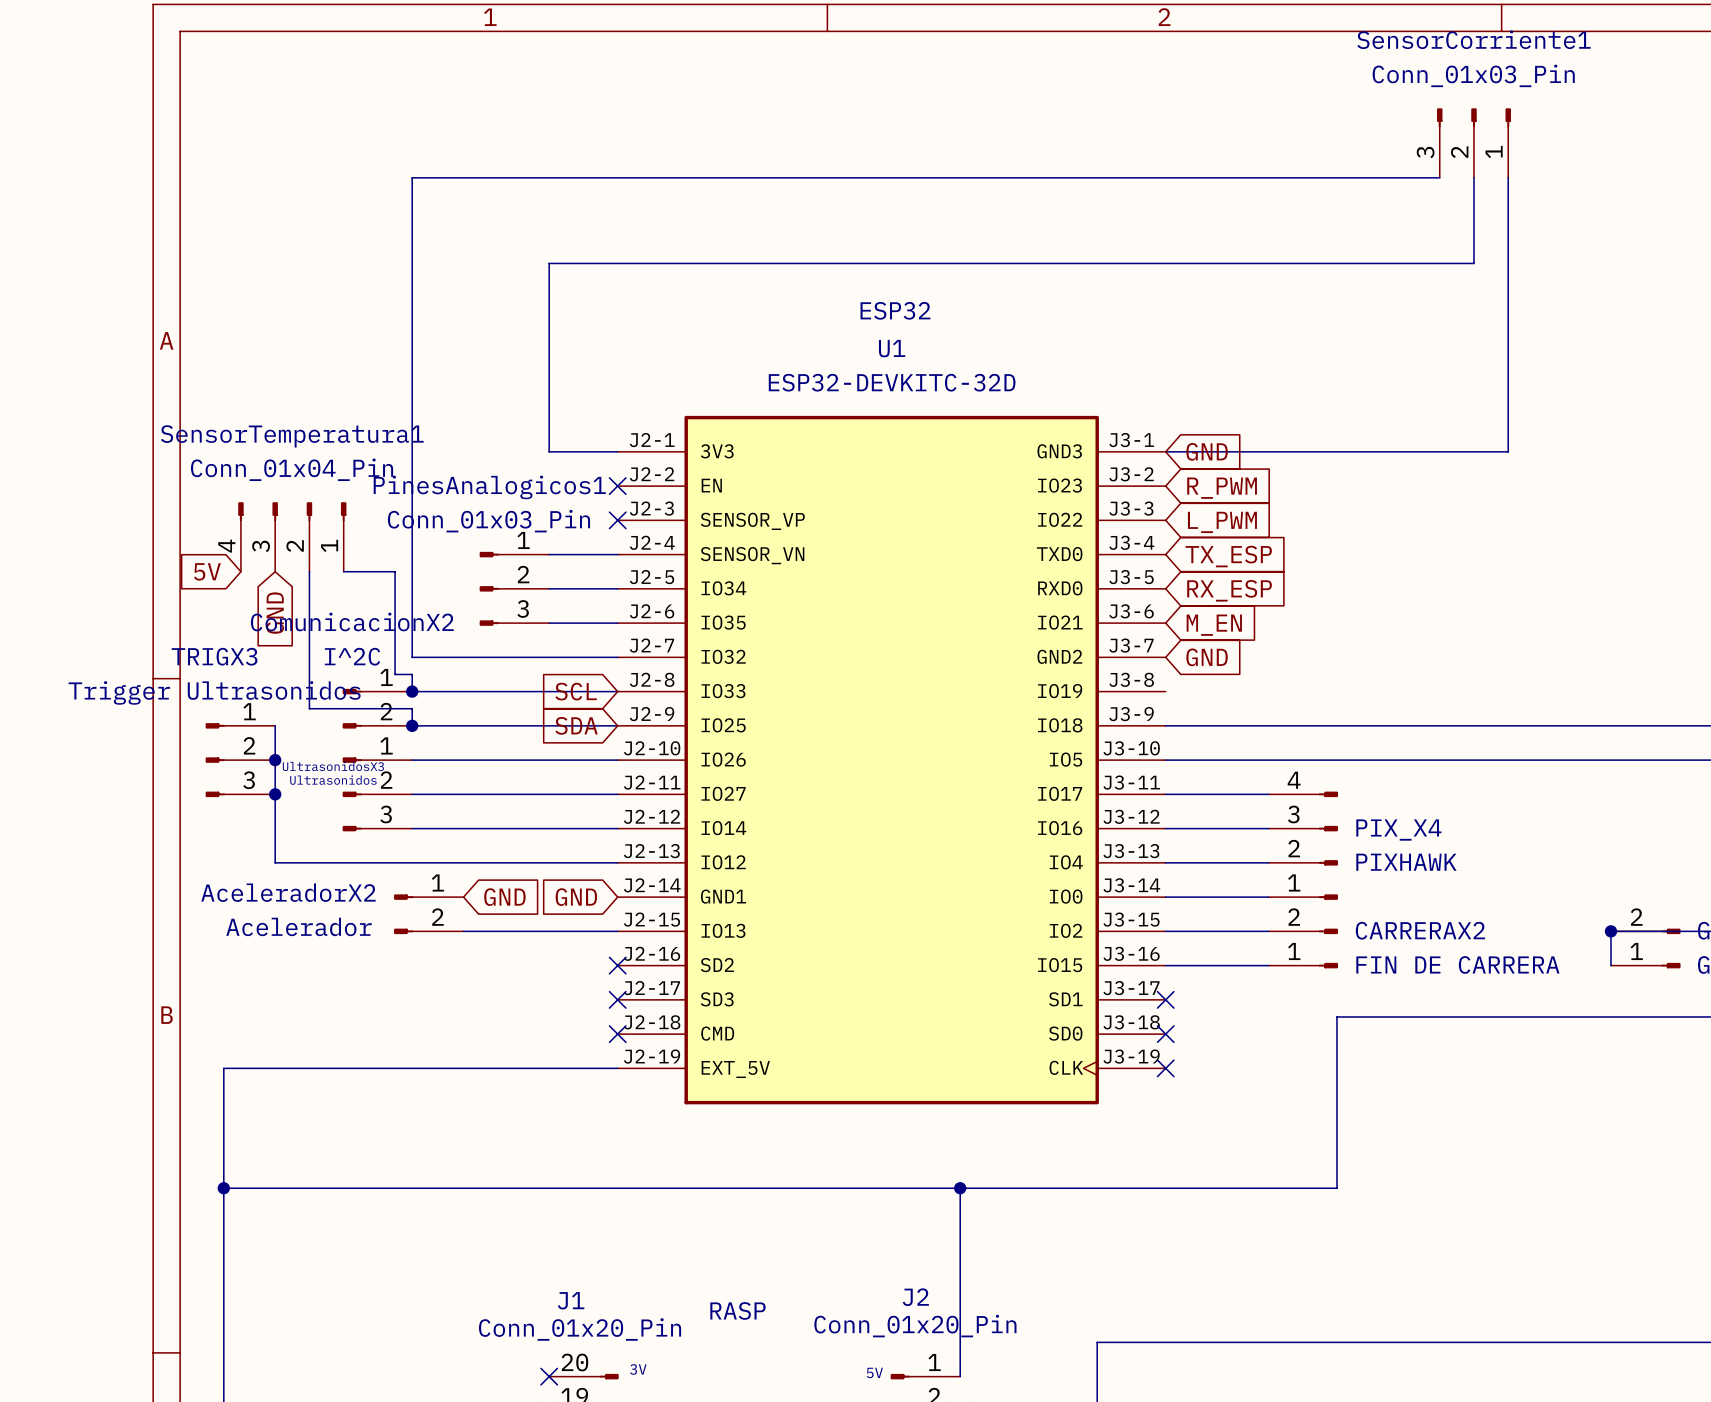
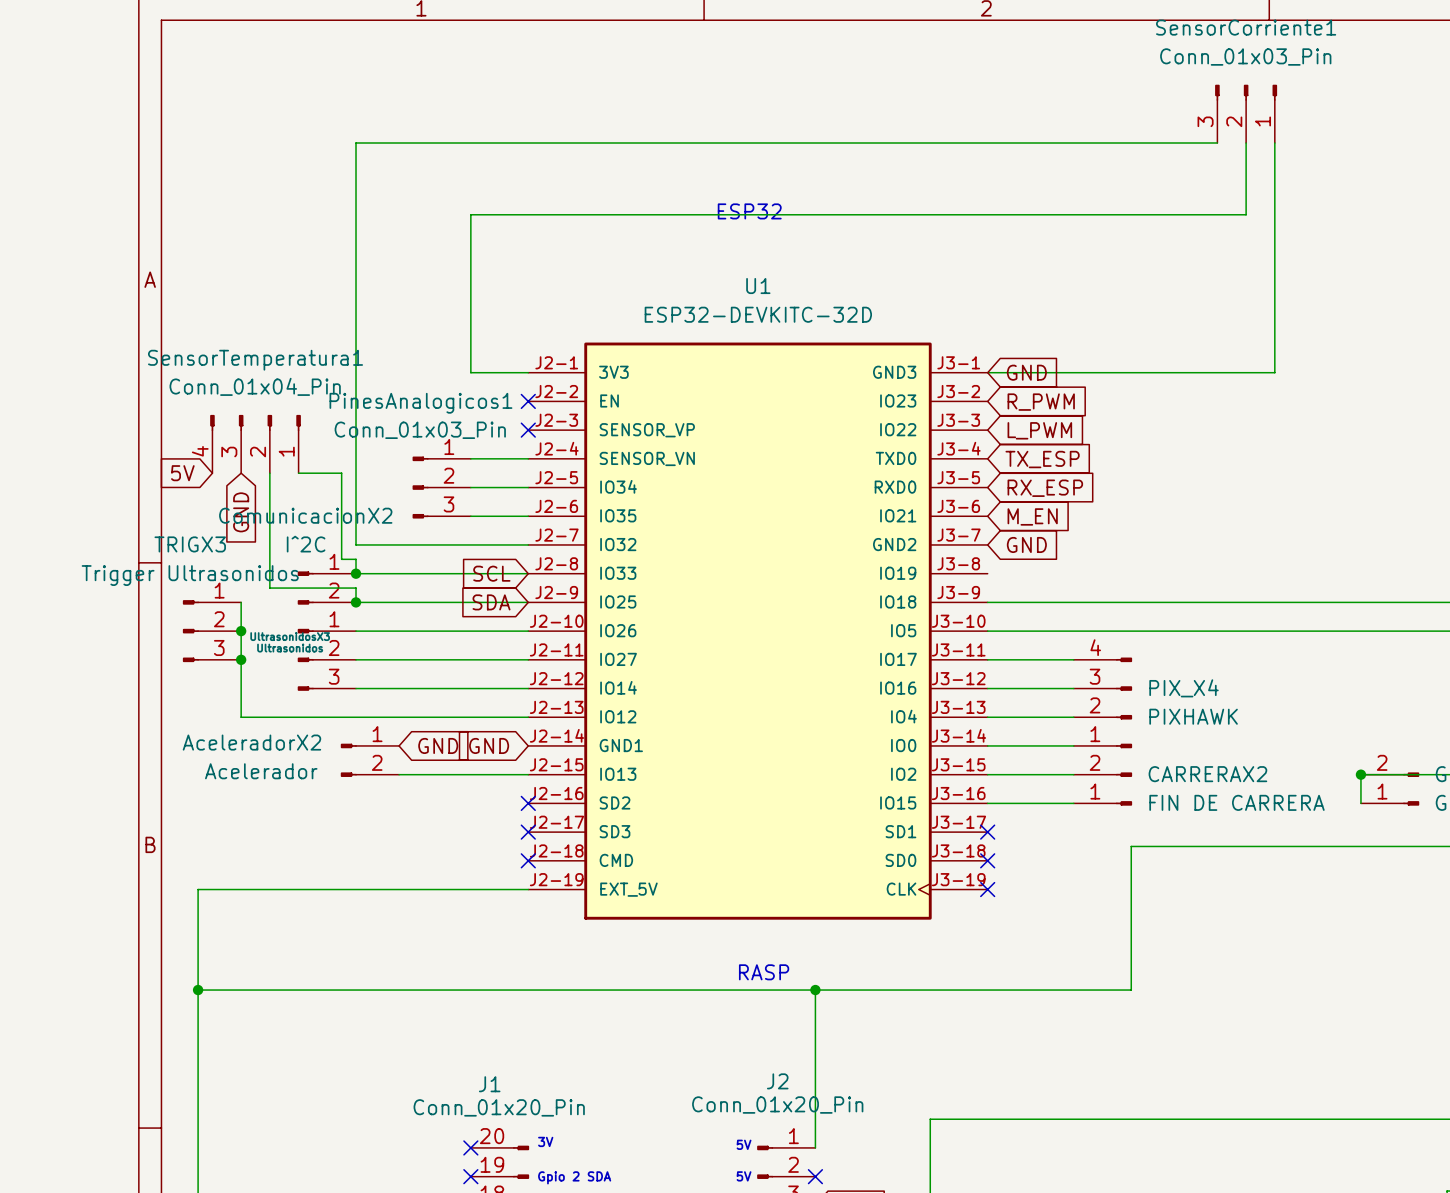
text position: ESP32 (895, 310) -> ESP32 (749, 211)
text position: RASP (737, 1310) -> RASP (764, 972)

